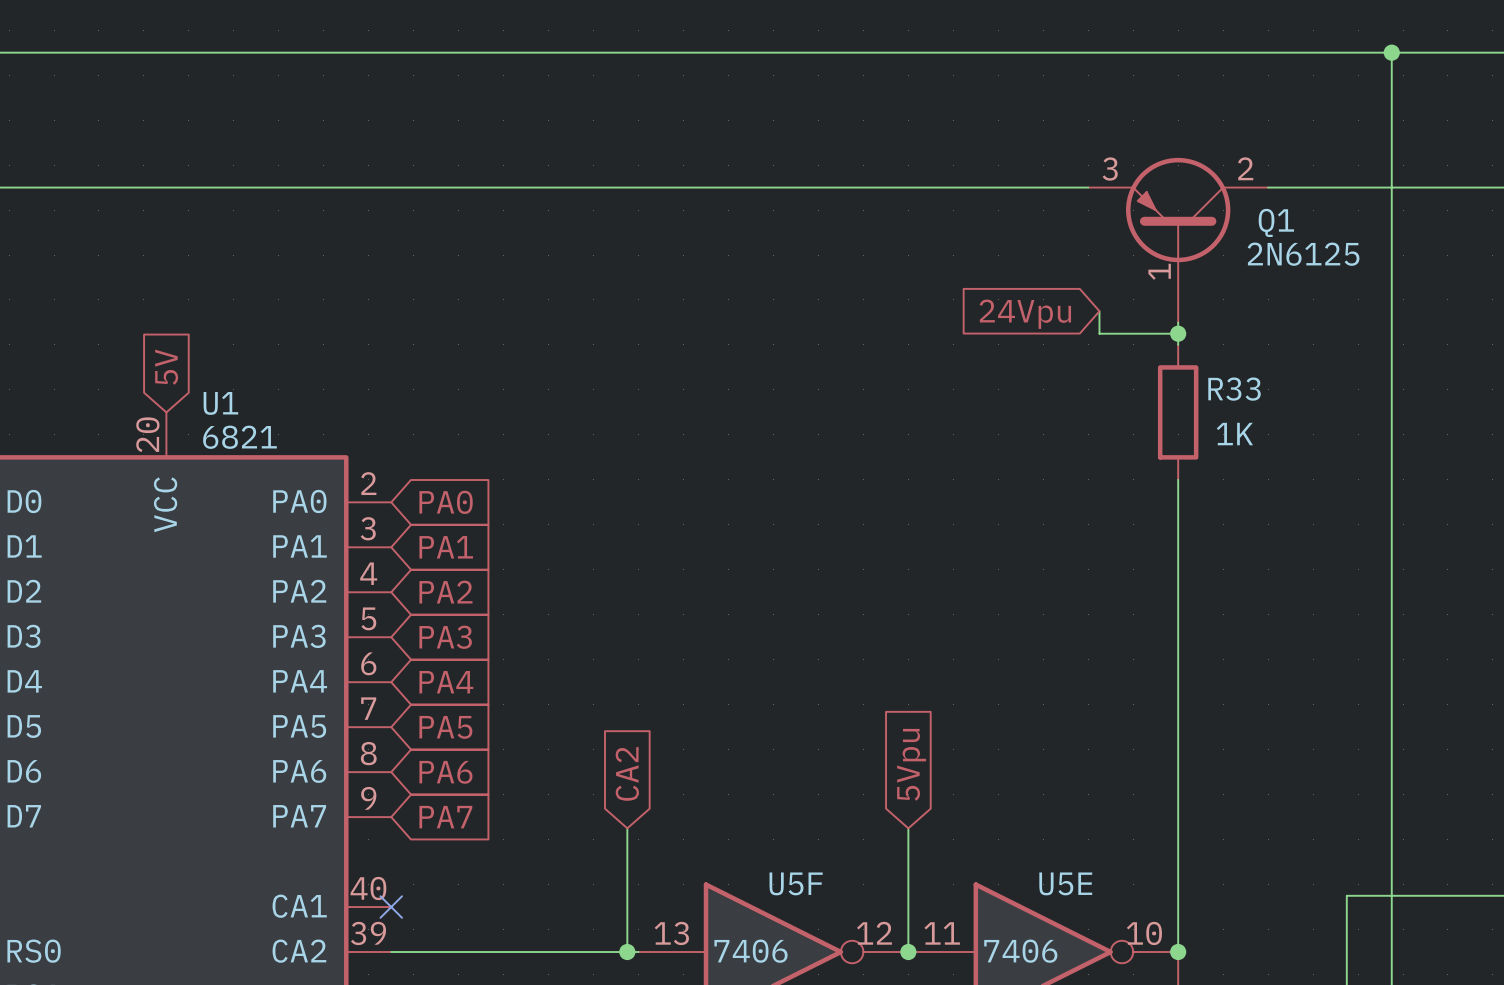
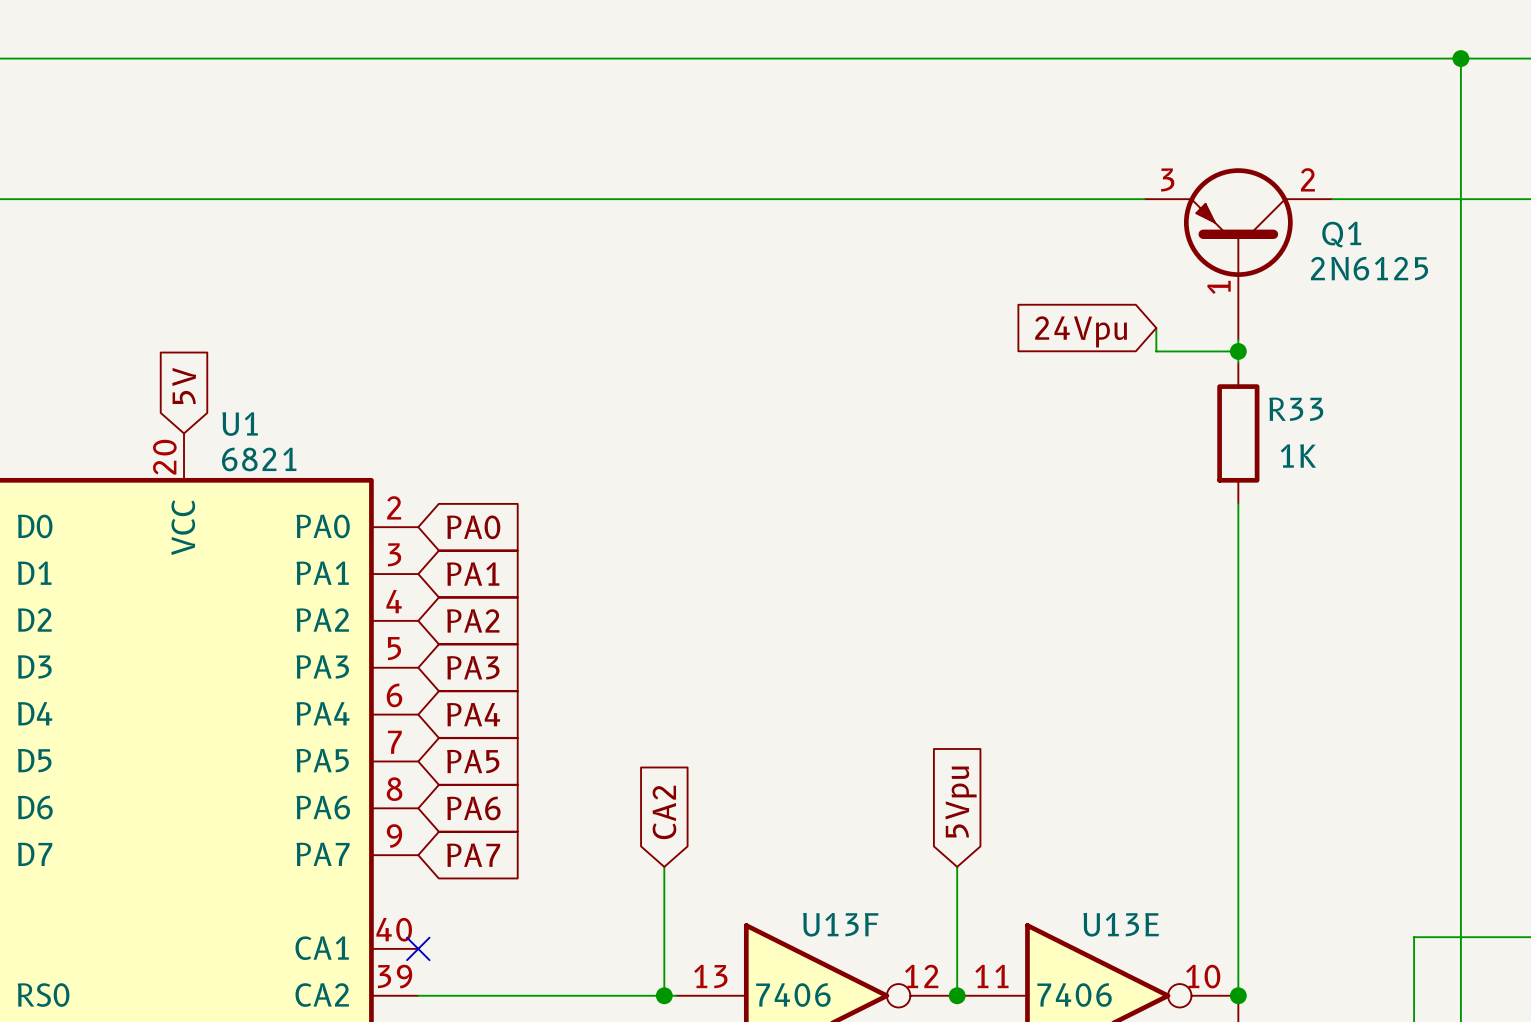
U5F name: U5F (796, 883) -> U13F (840, 924)
U5E name: U5E (1065, 883) -> U13E (1121, 924)

